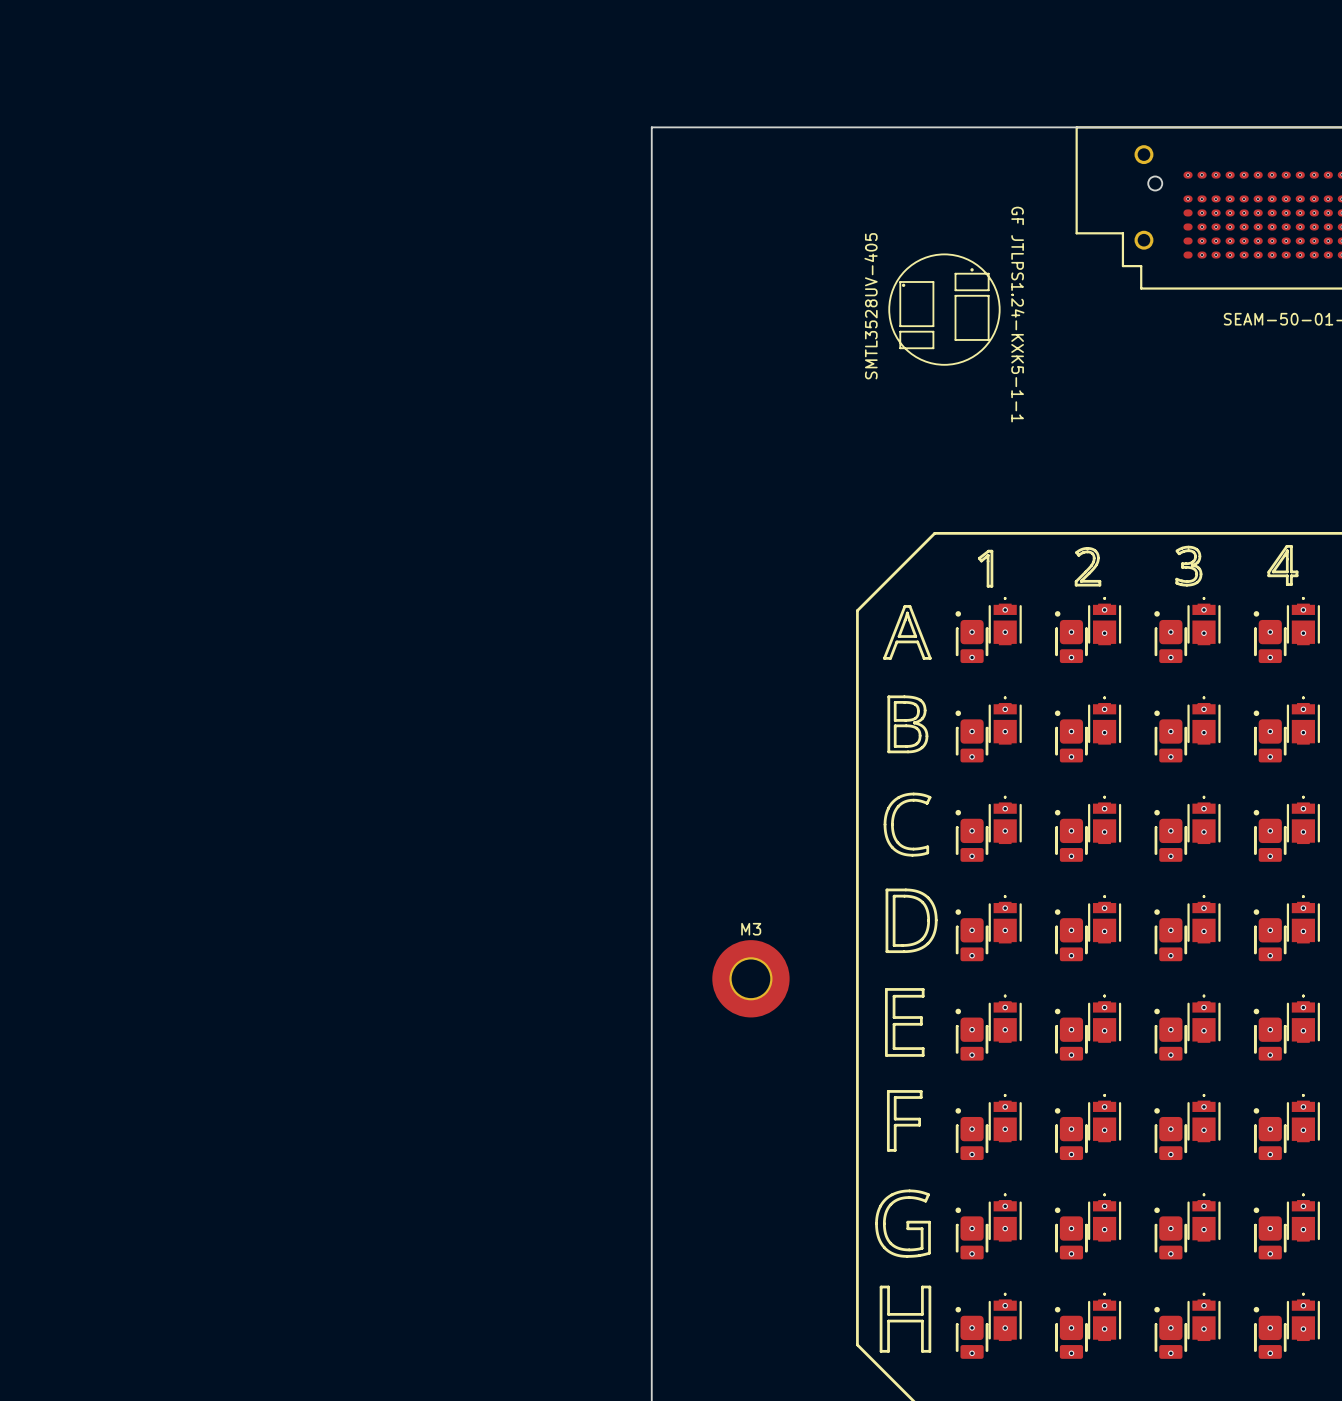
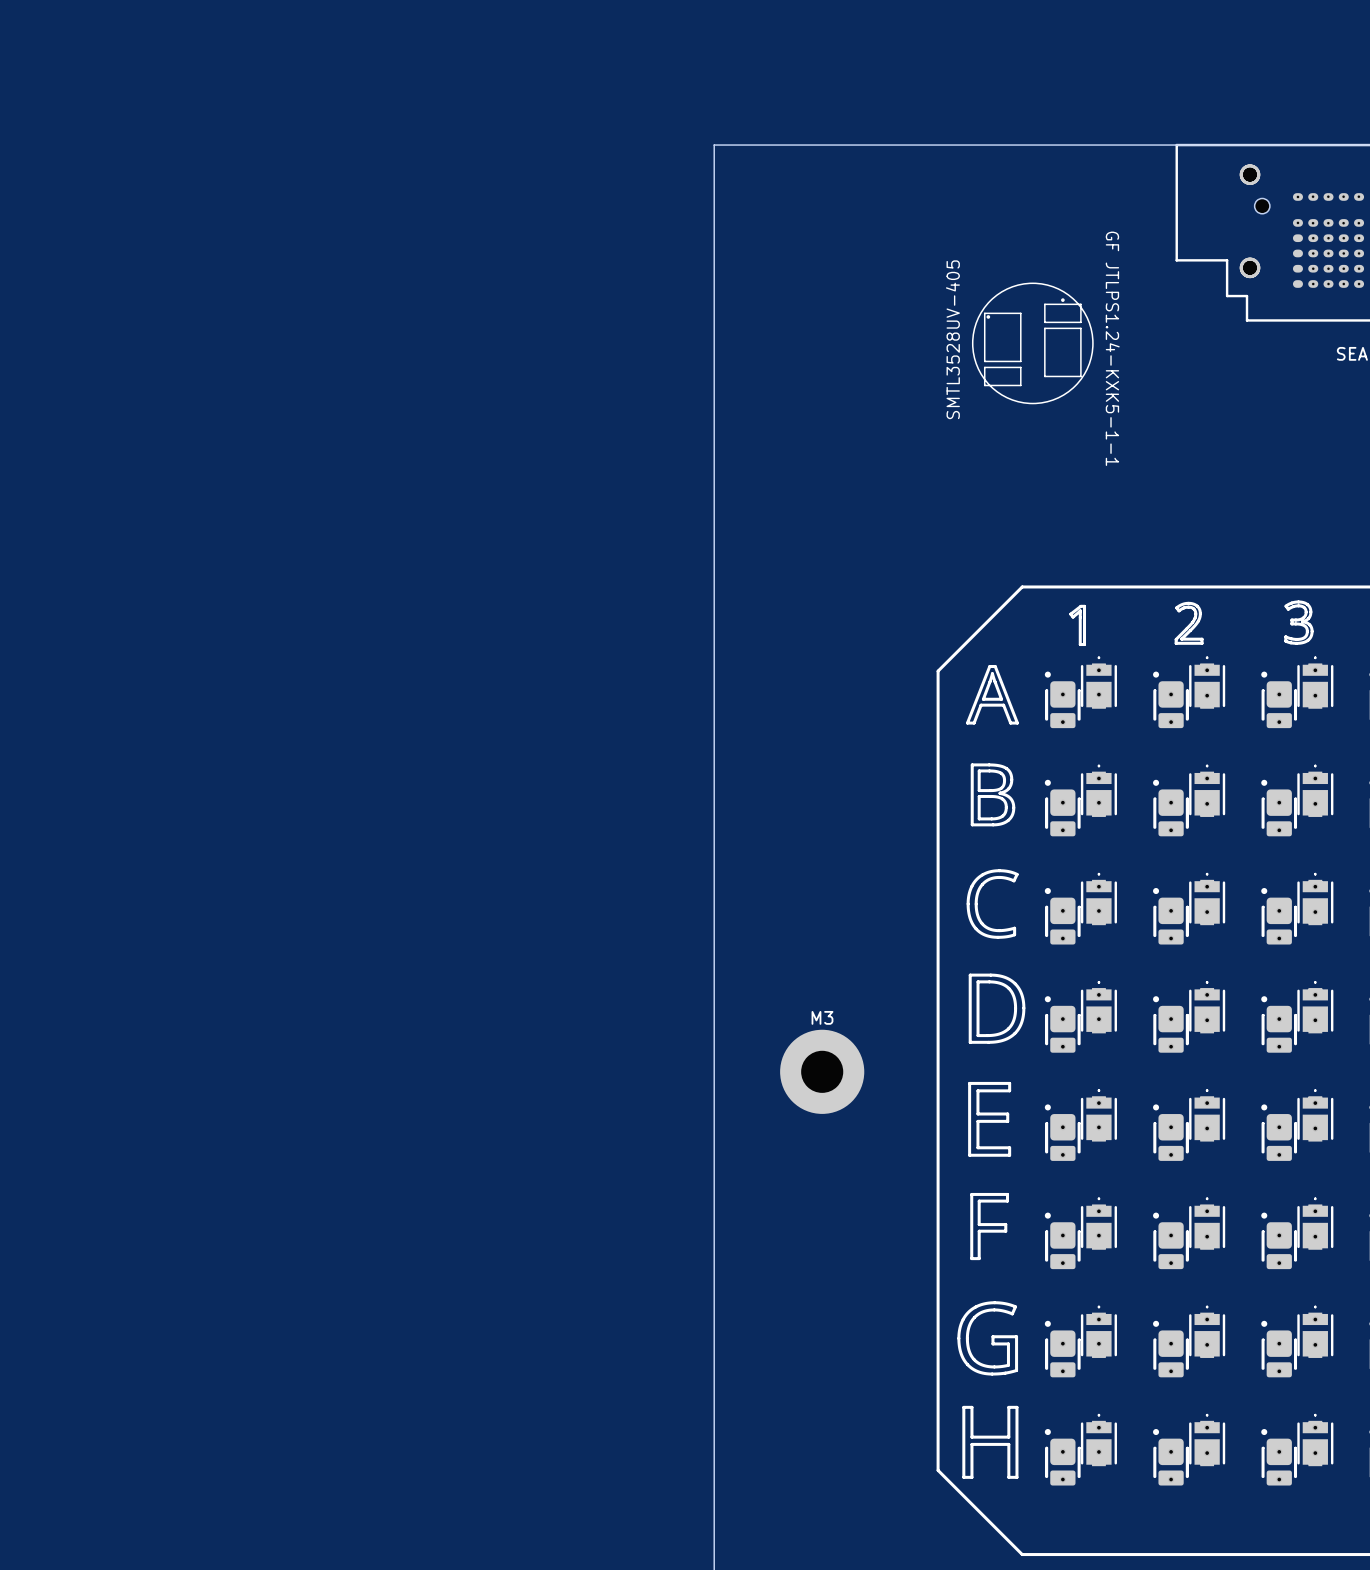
part: none -> (1250, 174)
part: none -> (1250, 267)

